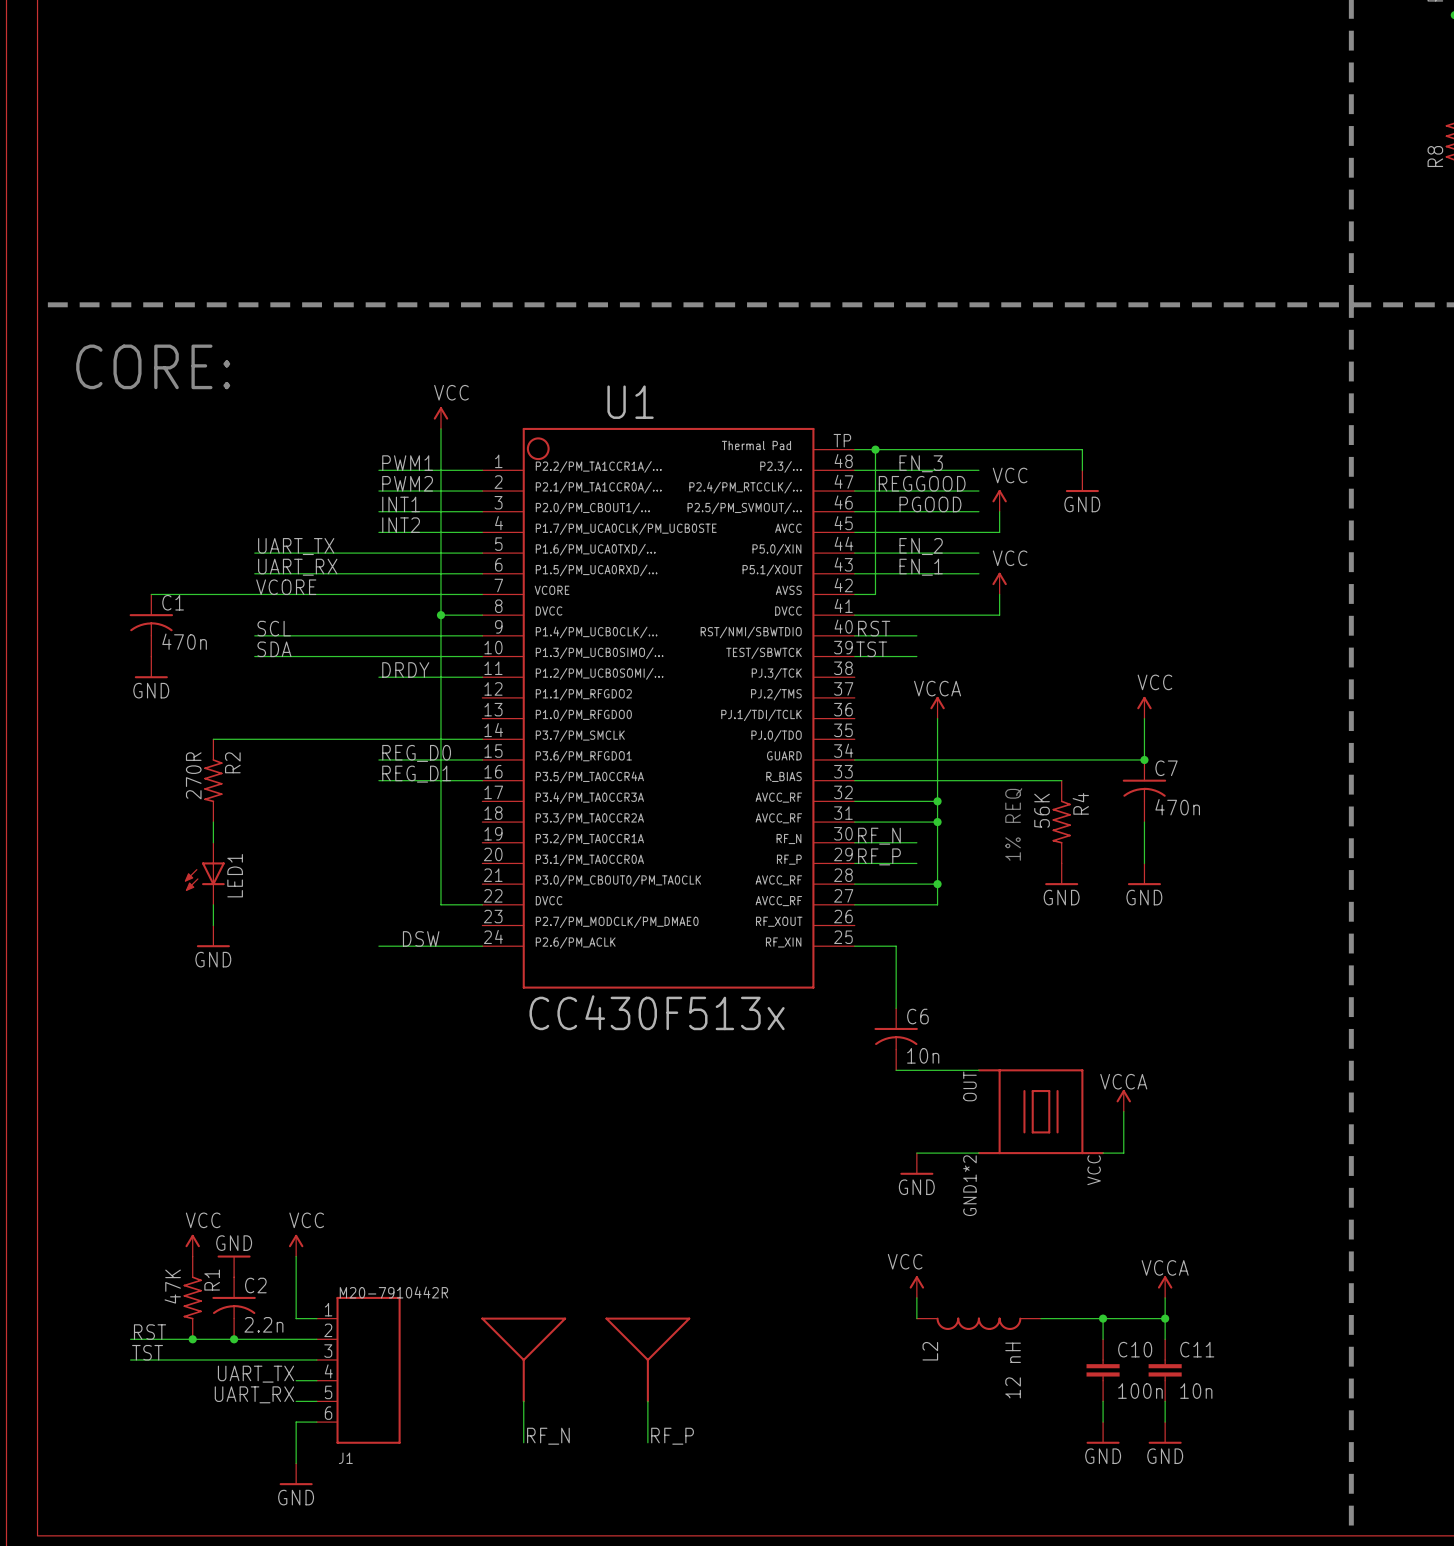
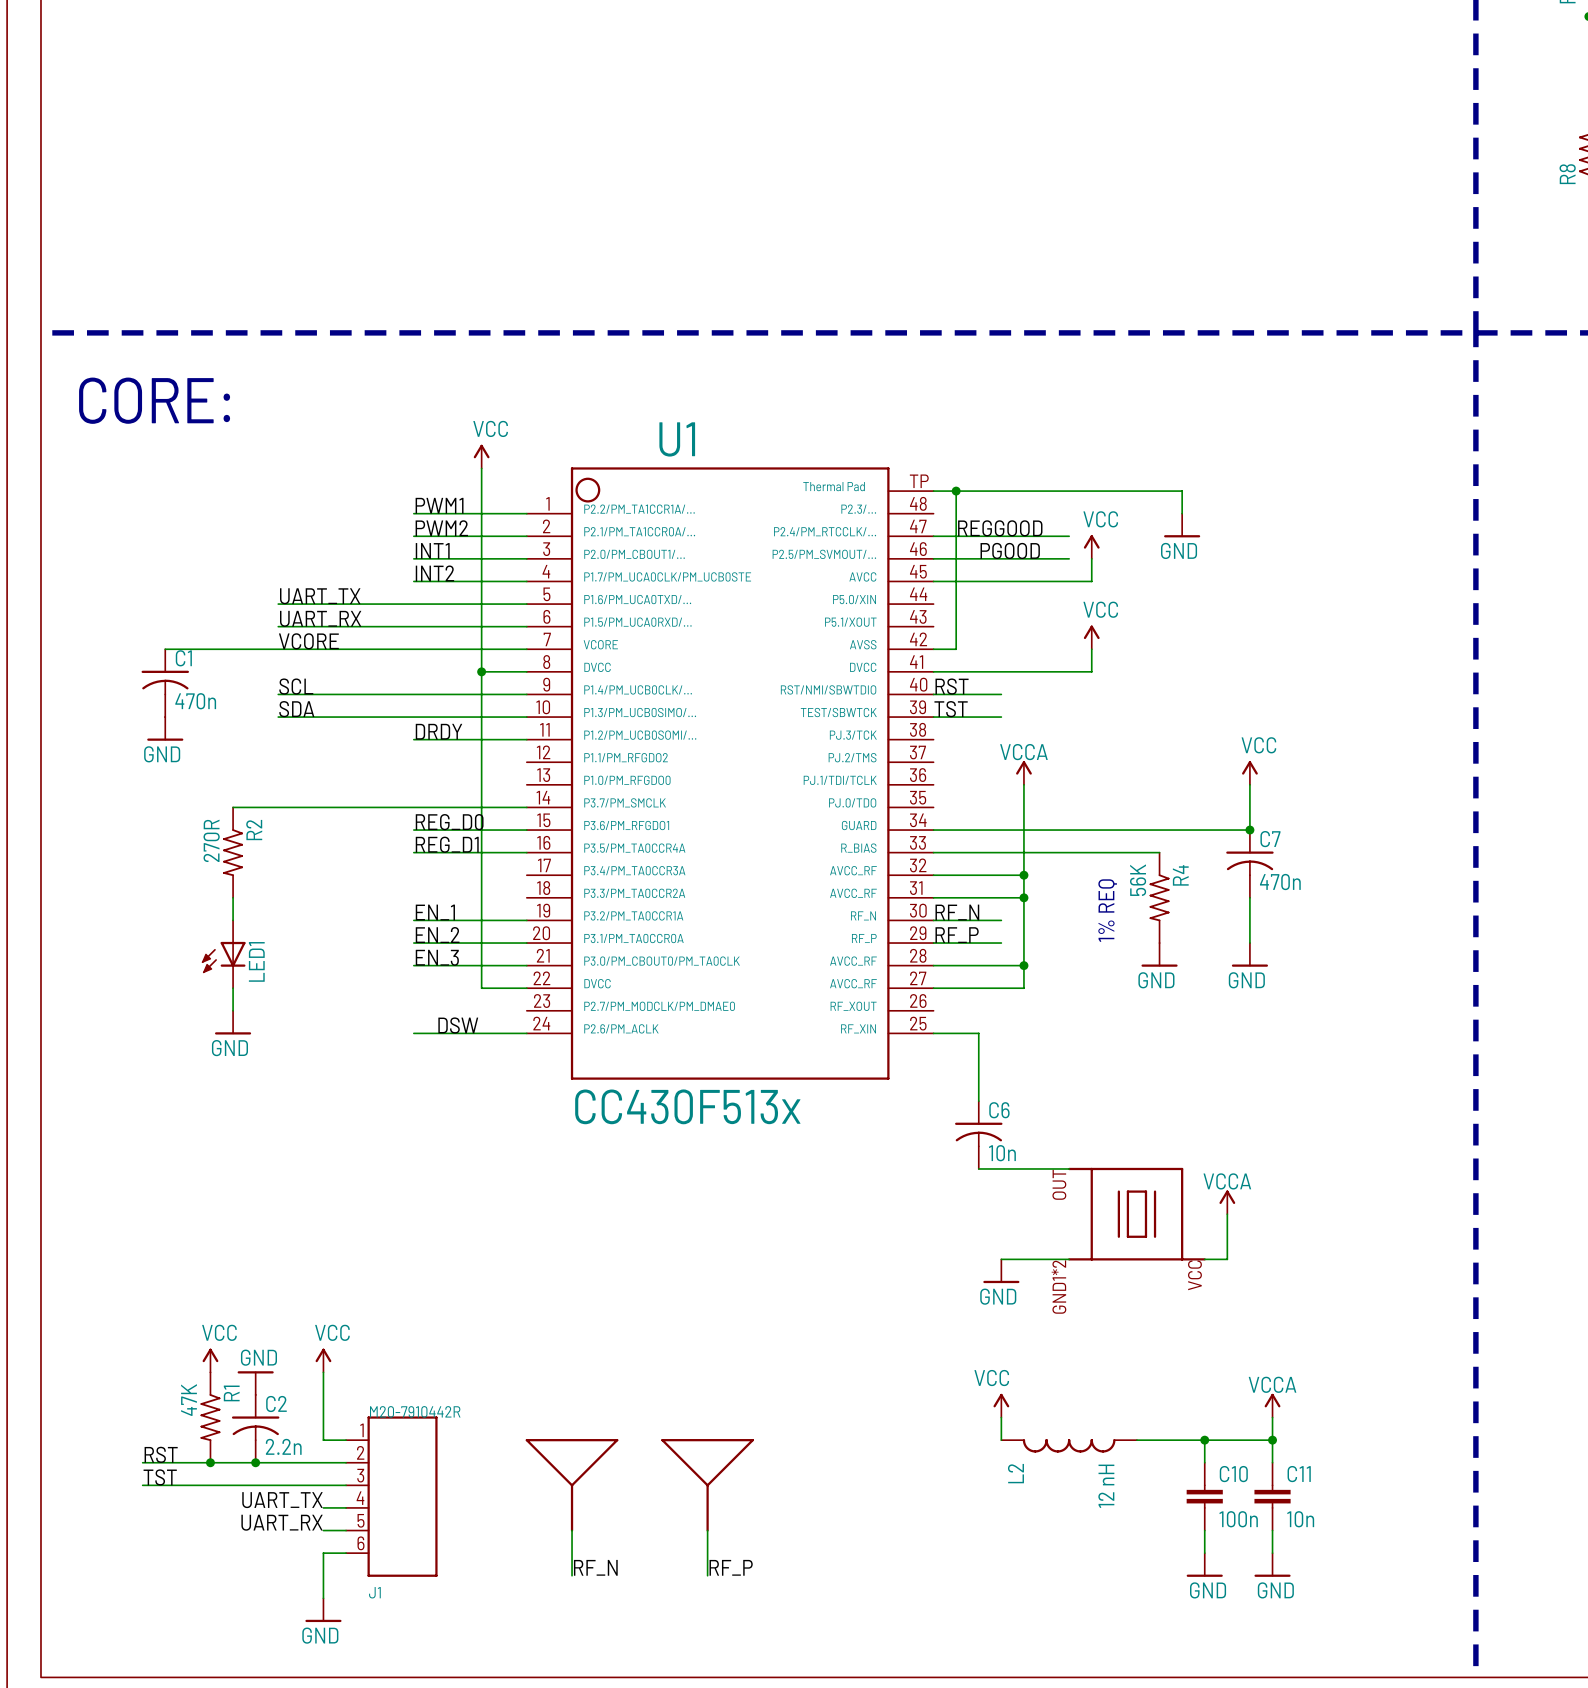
label: EN_3 (921, 463) -> none
wire: (854, 470) (978, 470) -> none
label: EN_2 (921, 546) -> none
wire: (854, 553) (978, 553) -> none
label: EN_1 (921, 567) -> none
wire: (854, 573) (978, 573) -> none
label: none -> EN_1 (435, 912)
wire: none -> (413, 920) (526, 920)
label: none -> EN_2 (437, 935)
wire: none -> (413, 943) (526, 943)
label: none -> EN_3 (437, 957)
wire: none -> (413, 965) (526, 965)

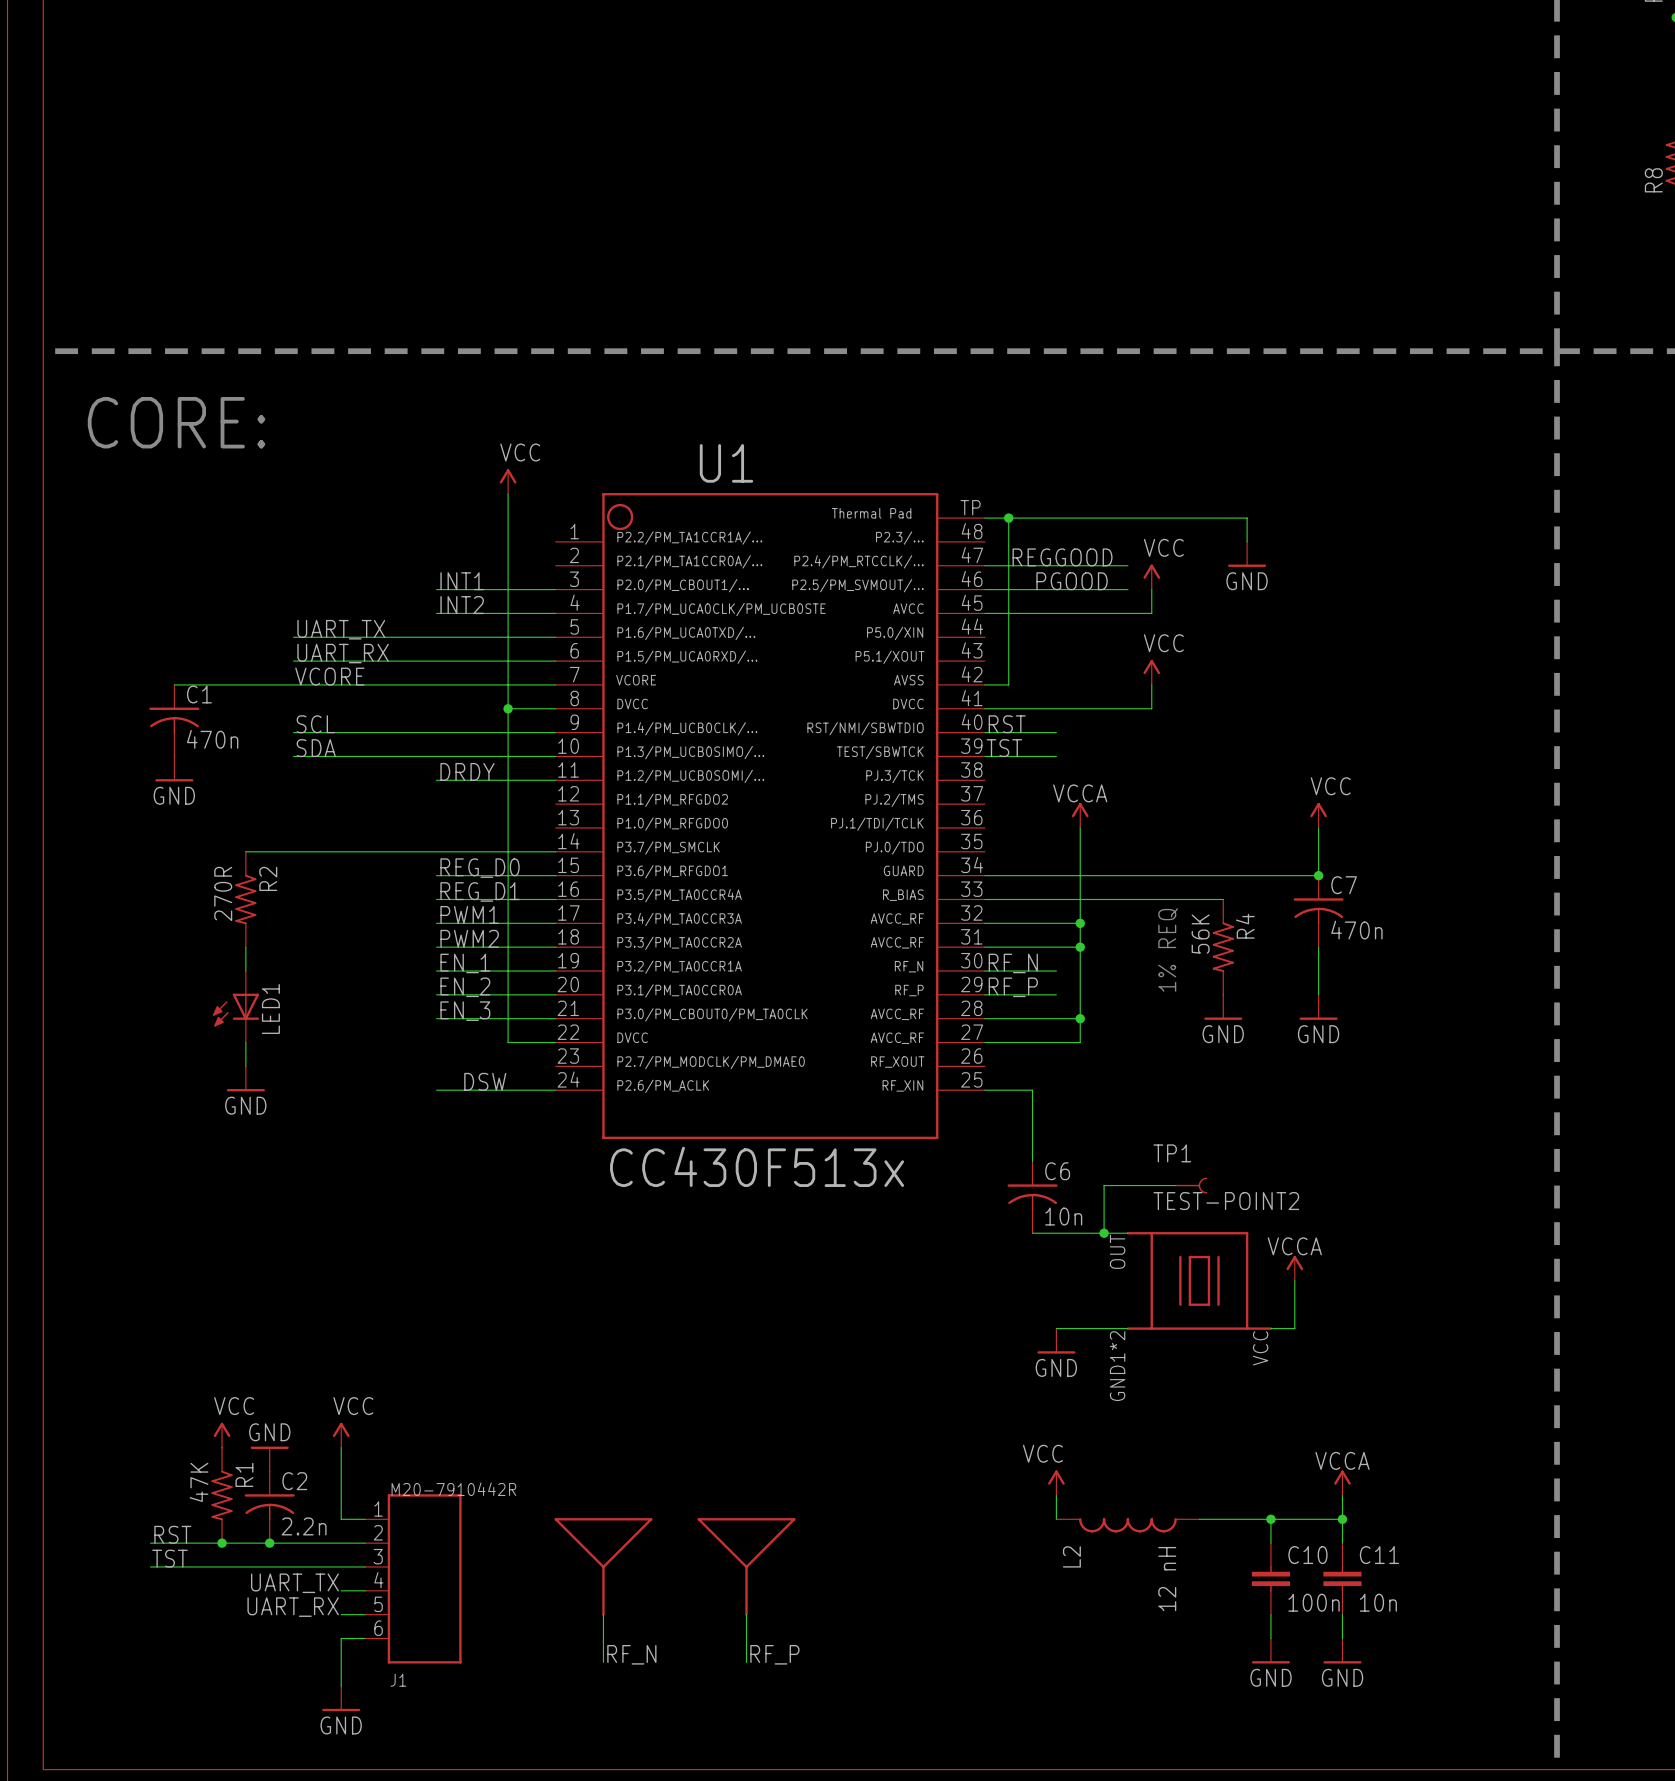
label: PWM1 (439, 505) -> none
wire: (413, 513) (526, 513) -> none
label: PWM2 (441, 528) -> none
wire: (413, 536) (526, 536) -> none
label: none -> PWM1 (469, 914)
wire: none -> (436, 923) (555, 923)
label: none -> PWM2 (469, 938)
wire: none -> (436, 947) (555, 947)
wire: none -> (1175, 1185) (1104, 1185) (1104, 1233)
TP1: none -> TEST-POINT2 (1191, 1185)
junction: none -> (1104, 1233)

